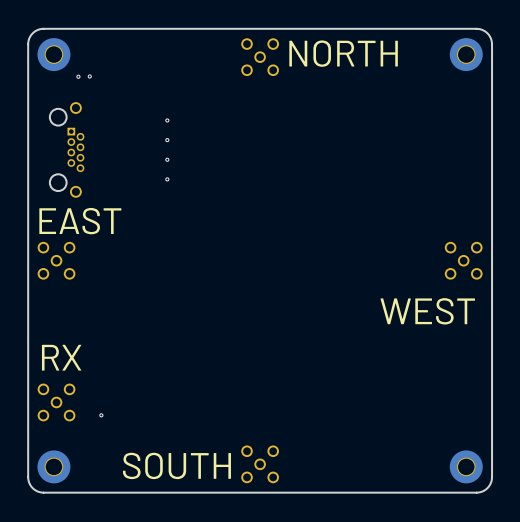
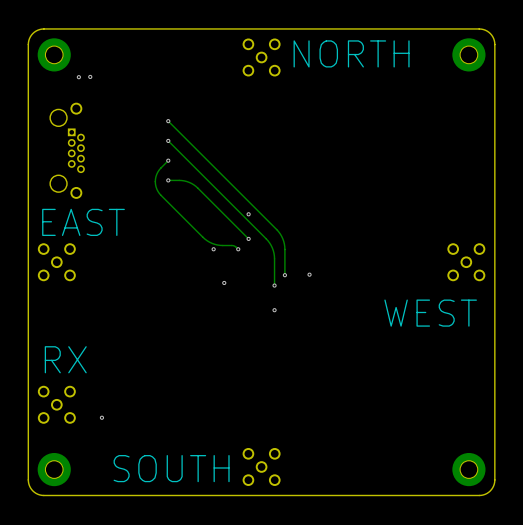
track: none -> (168, 121) (278, 231) (284, 246) (284, 275)
track: none -> (168, 140) (269, 243) (274, 256) (274, 285)
track: none -> (168, 160) (155, 176) (155, 184) (159, 193) (207, 240) (217, 244) (233, 245) (238, 249)
track: none -> (168, 180) (184, 180) (193, 184) (248, 238)
via: none -> (248, 214)
via: none -> (248, 238)
via: none -> (213, 249)
via: none -> (238, 249)
via: none -> (284, 275)
via: none -> (309, 274)
via: none -> (224, 282)
via: none -> (274, 285)
via: none -> (274, 310)

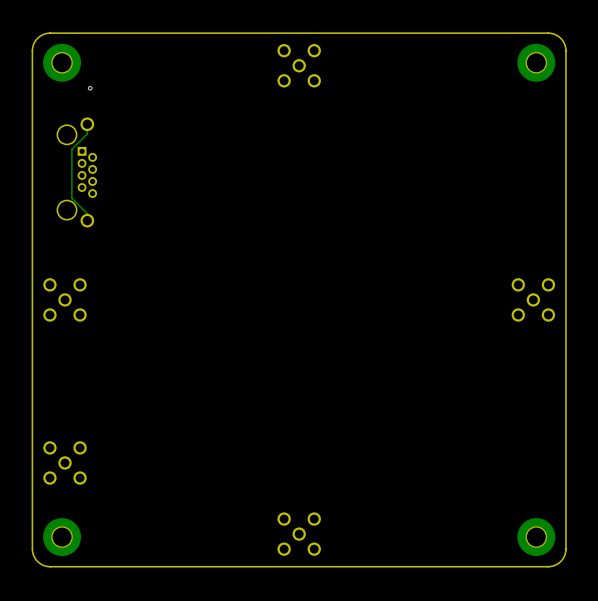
text: NORTH (351, 53) -> none
via: (90, 76) -> none
track: none -> (87, 124) (87, 133) (71, 149) (71, 198) (87, 213) (87, 220)
track: (168, 121) (278, 231) (284, 246) (284, 275) -> none
via: (168, 121) -> none
track: (168, 140) (269, 243) (274, 256) (274, 285) -> none
via: (168, 140) -> none
track: (168, 160) (155, 176) (155, 184) (159, 193) (207, 240) (217, 244) (233, 245) (238, 249) -> none
via: (168, 160) -> none
track: (168, 180) (184, 180) (193, 184) (248, 238) -> none
via: (168, 180) -> none
via: (248, 214) -> none
text: EAST (83, 222) -> none
via: (248, 238) -> none
via: (213, 249) -> none
via: (238, 249) -> none
via: (309, 274) -> none
via: (284, 275) -> none
via: (224, 282) -> none
via: (274, 285) -> none
via: (274, 310) -> none
text: WEST (430, 313) -> none
text: RX (65, 359) -> none
via: (101, 417) -> none
text: SOUTH (171, 468) -> none

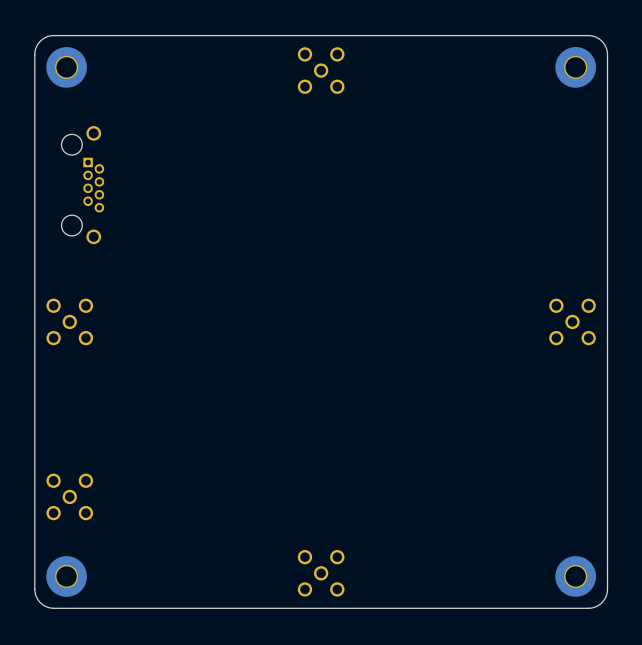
via: (90, 88) -> none
track: (87, 124) (87, 133) (71, 149) (71, 198) (87, 213) (87, 220) -> none

